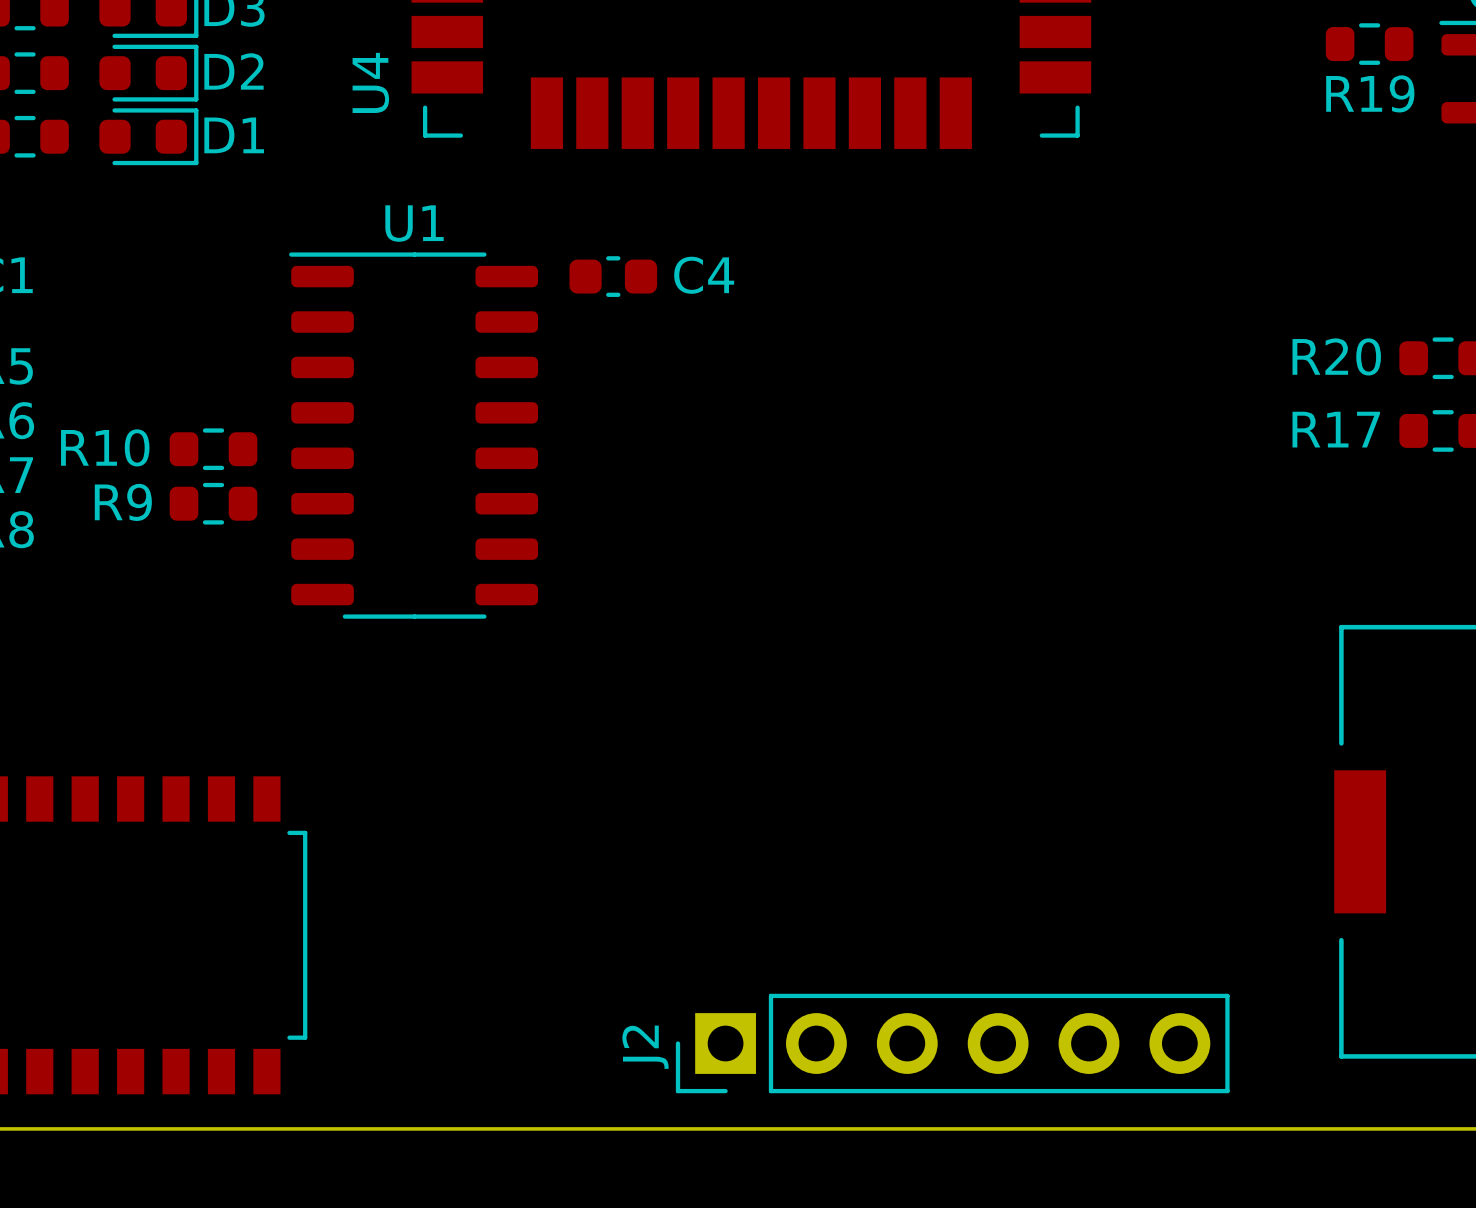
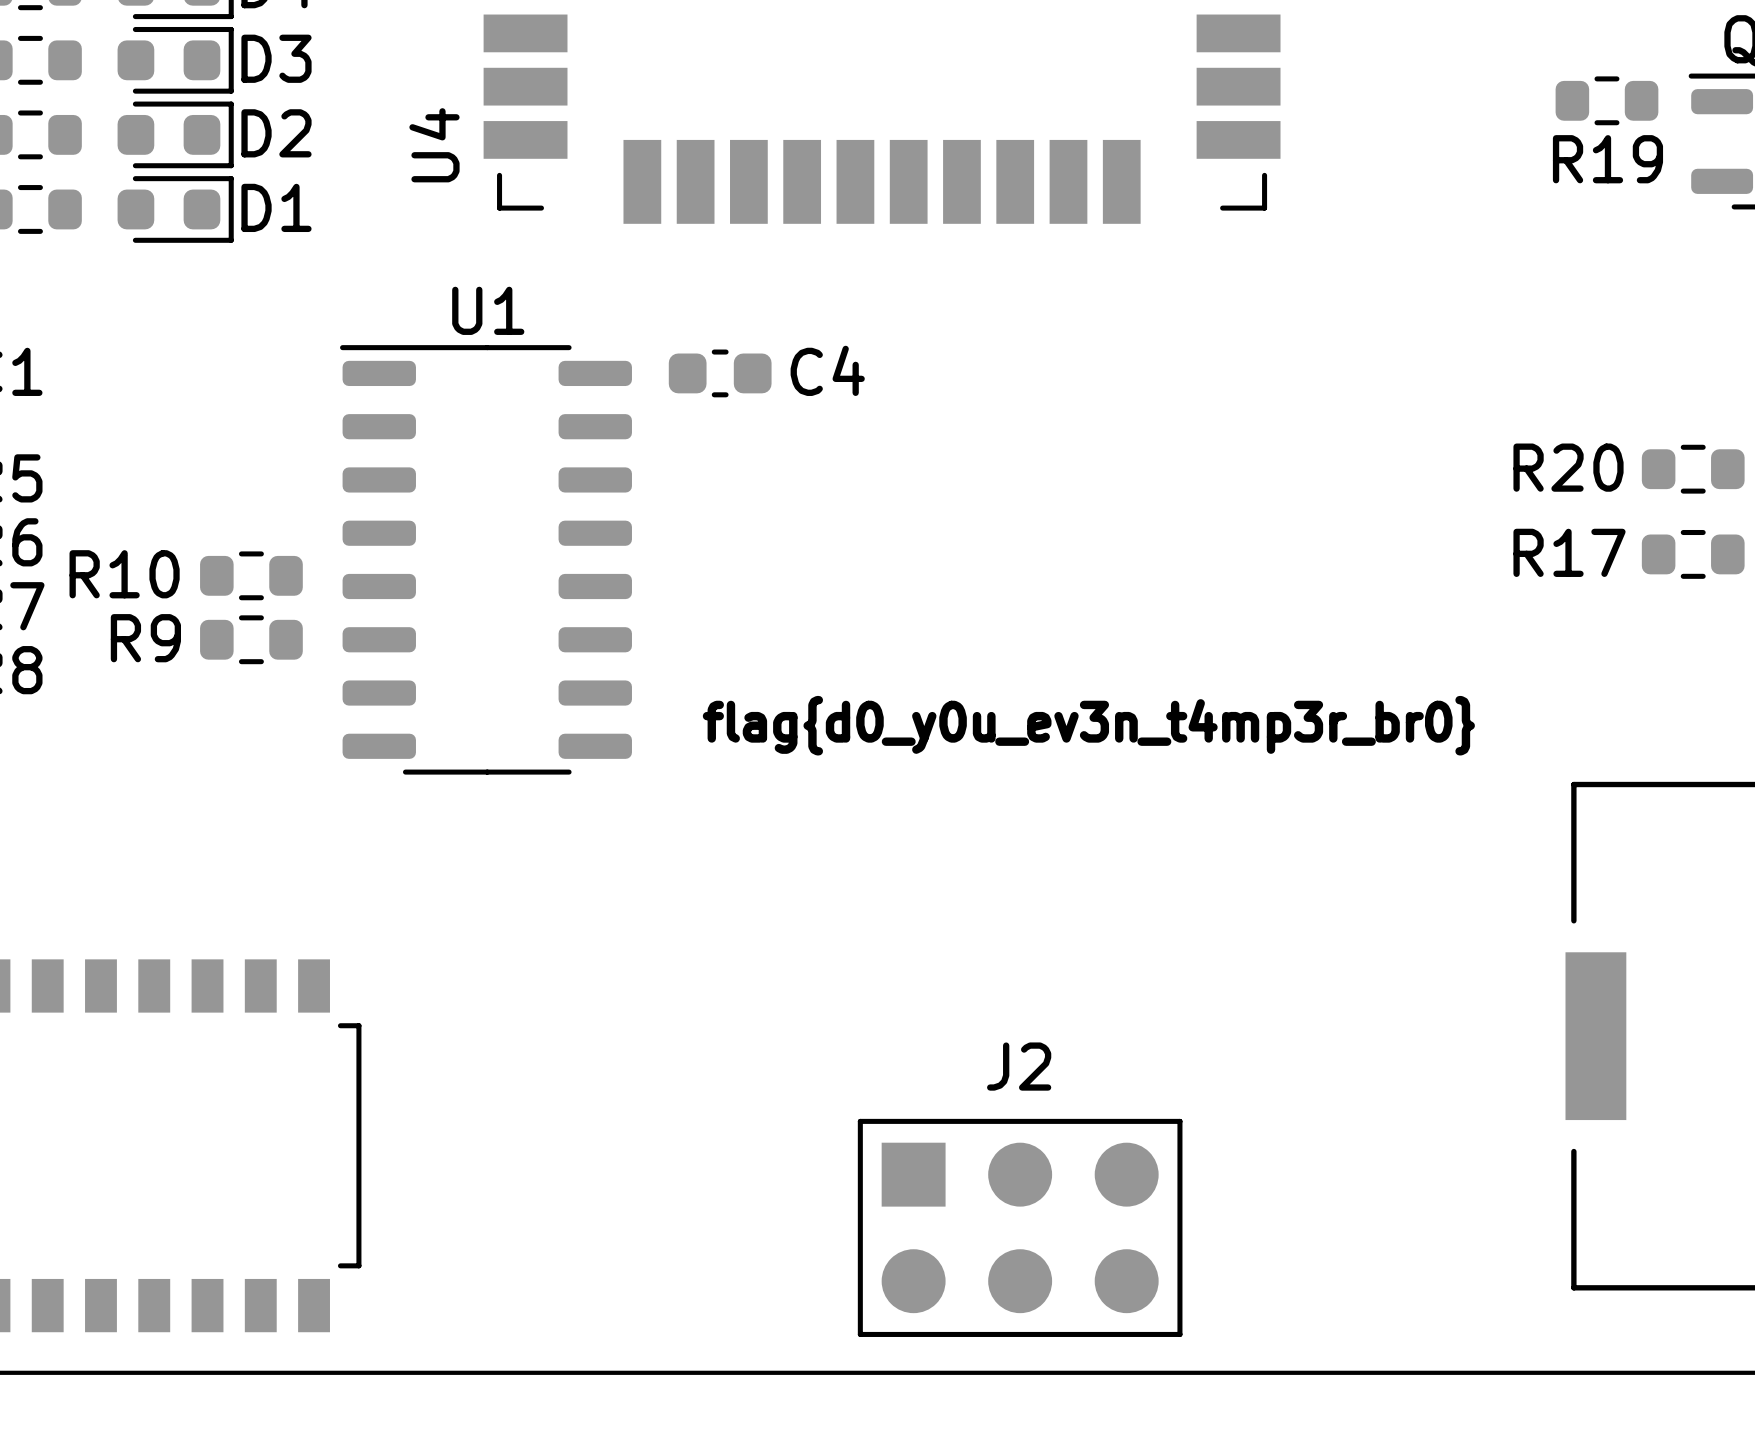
text: none -> flag{d0_y0u_ev3n_t4mp3r_br0} (1088, 725)
J2 footprint: [675, 993, 1230, 1094] -> [857, 1118, 1183, 1337]
J2 name position: J2 (645, 1047) -> J2 (1019, 1066)

